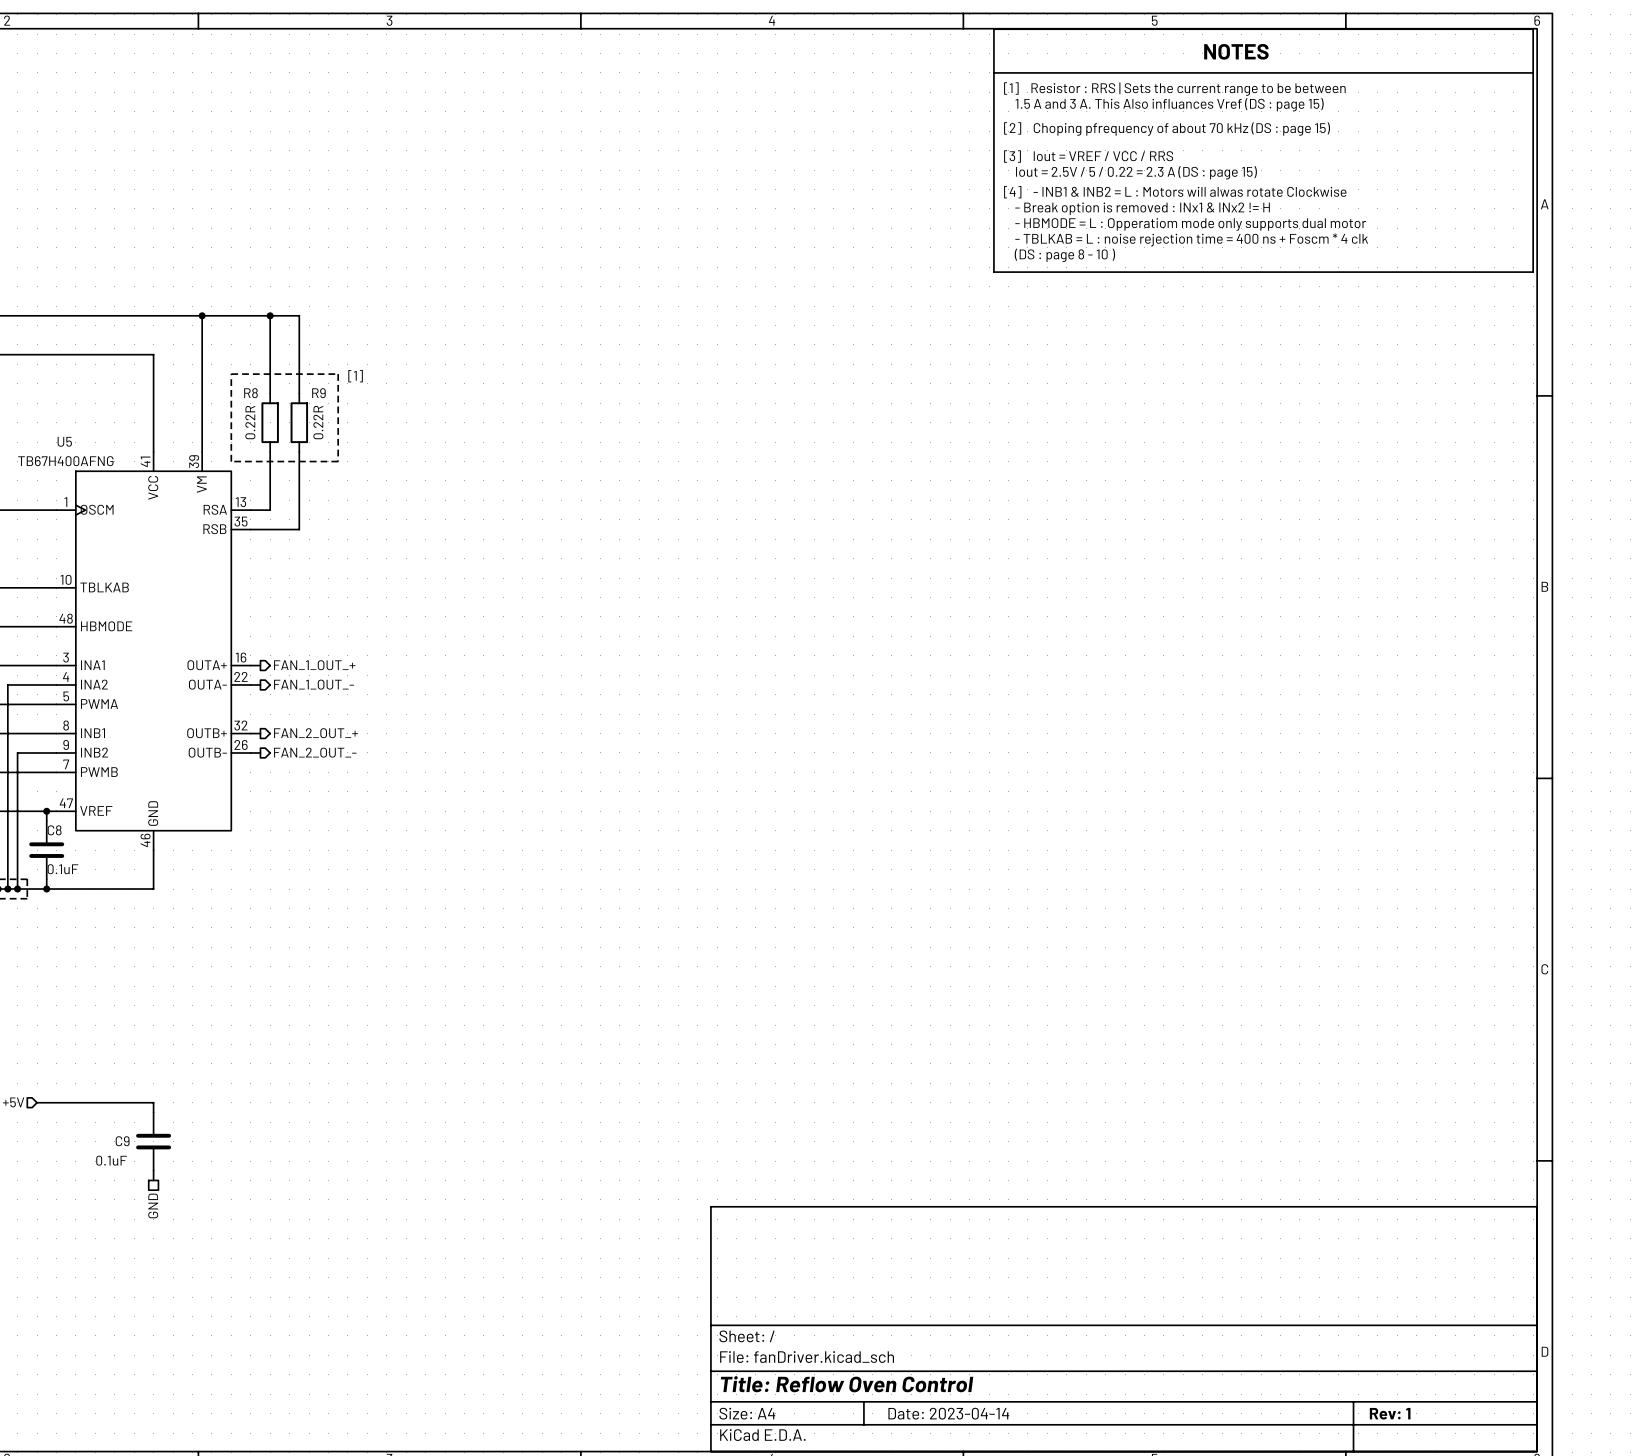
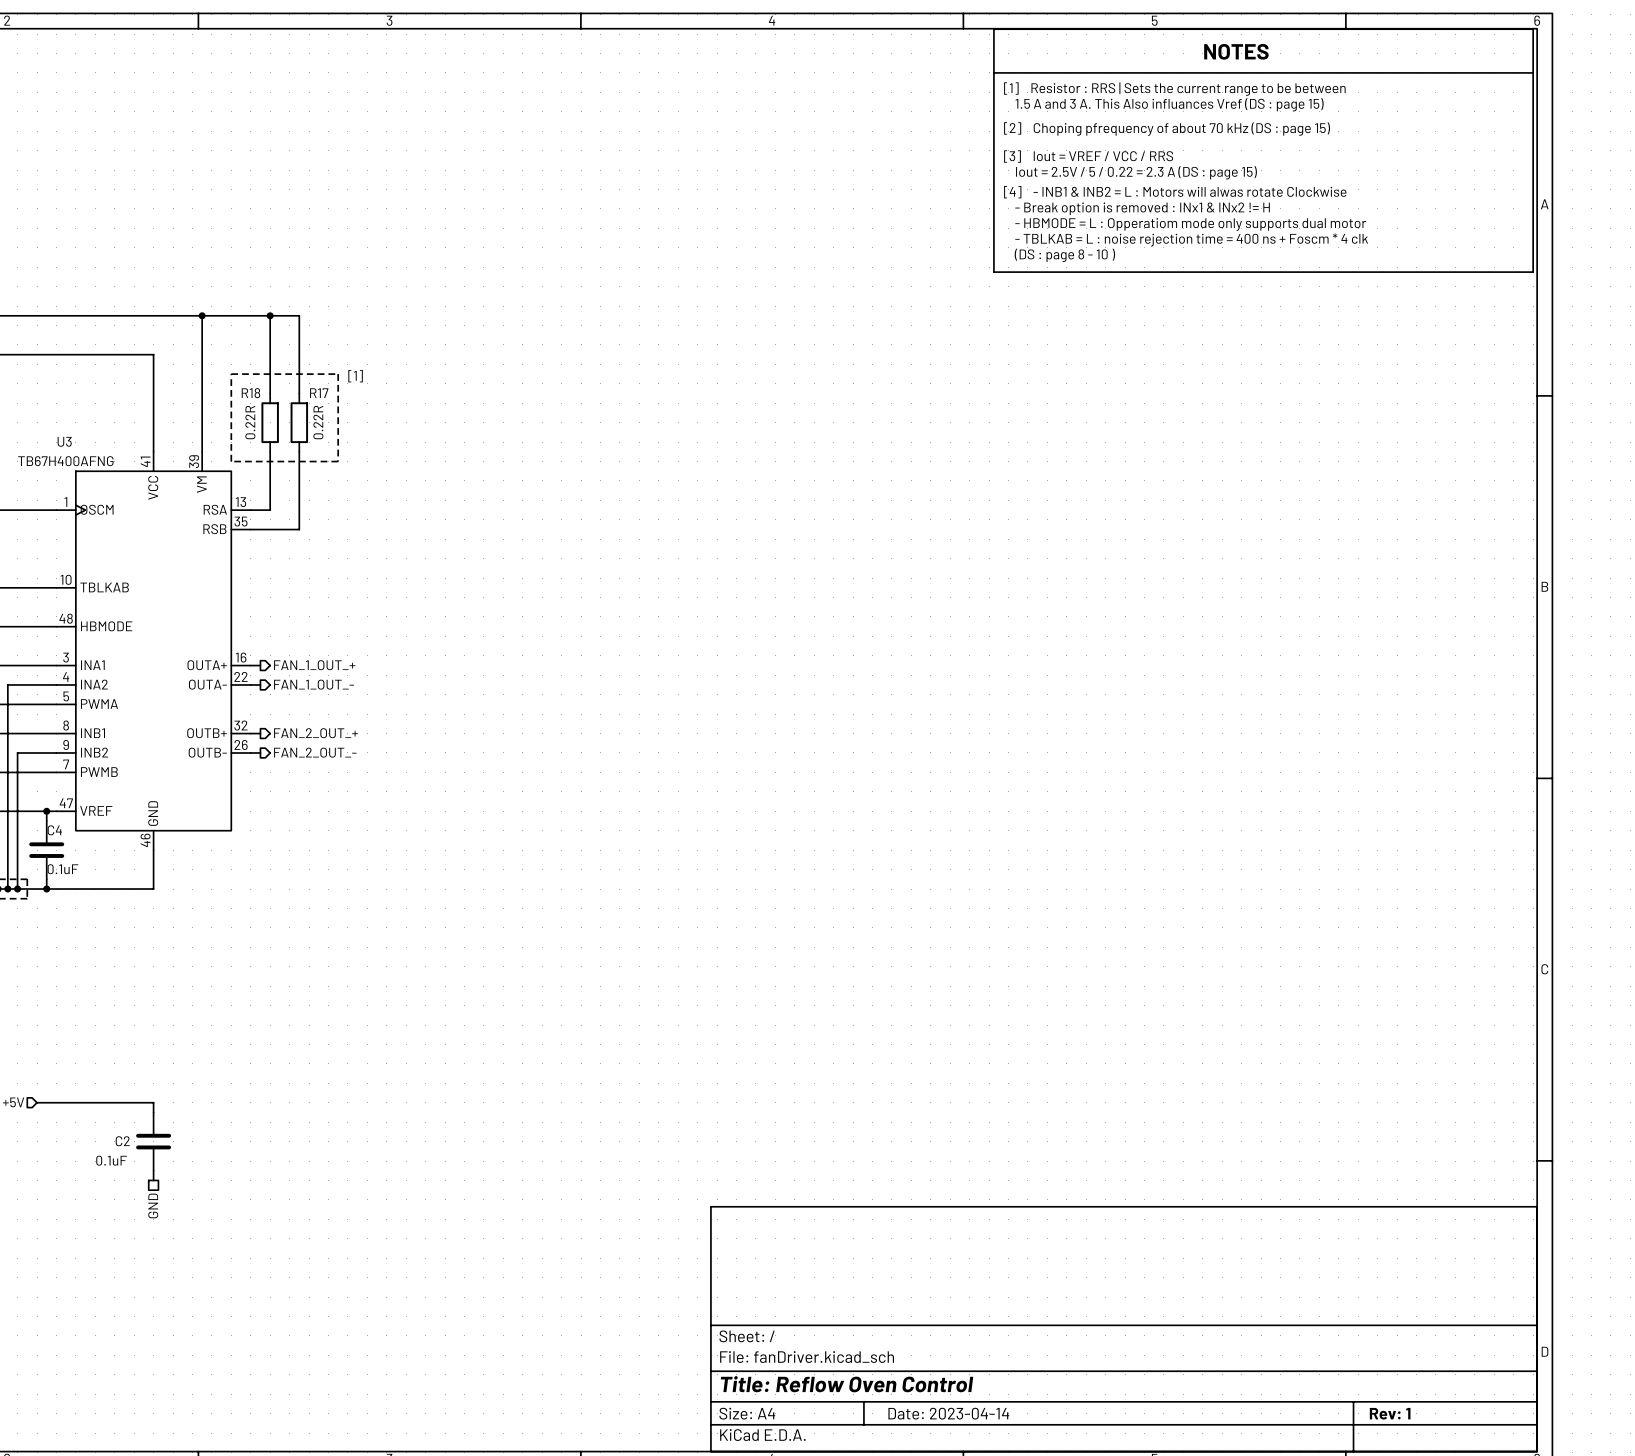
R8 name: R8 (250, 393) -> R18 (250, 393)
R9 name: R9 (318, 393) -> R17 (319, 393)
U5 name: U5 (64, 441) -> U3 (64, 441)
C8 name: C8 (54, 830) -> C4 (54, 830)
C9 name: C9 (122, 1141) -> C2 (122, 1141)

